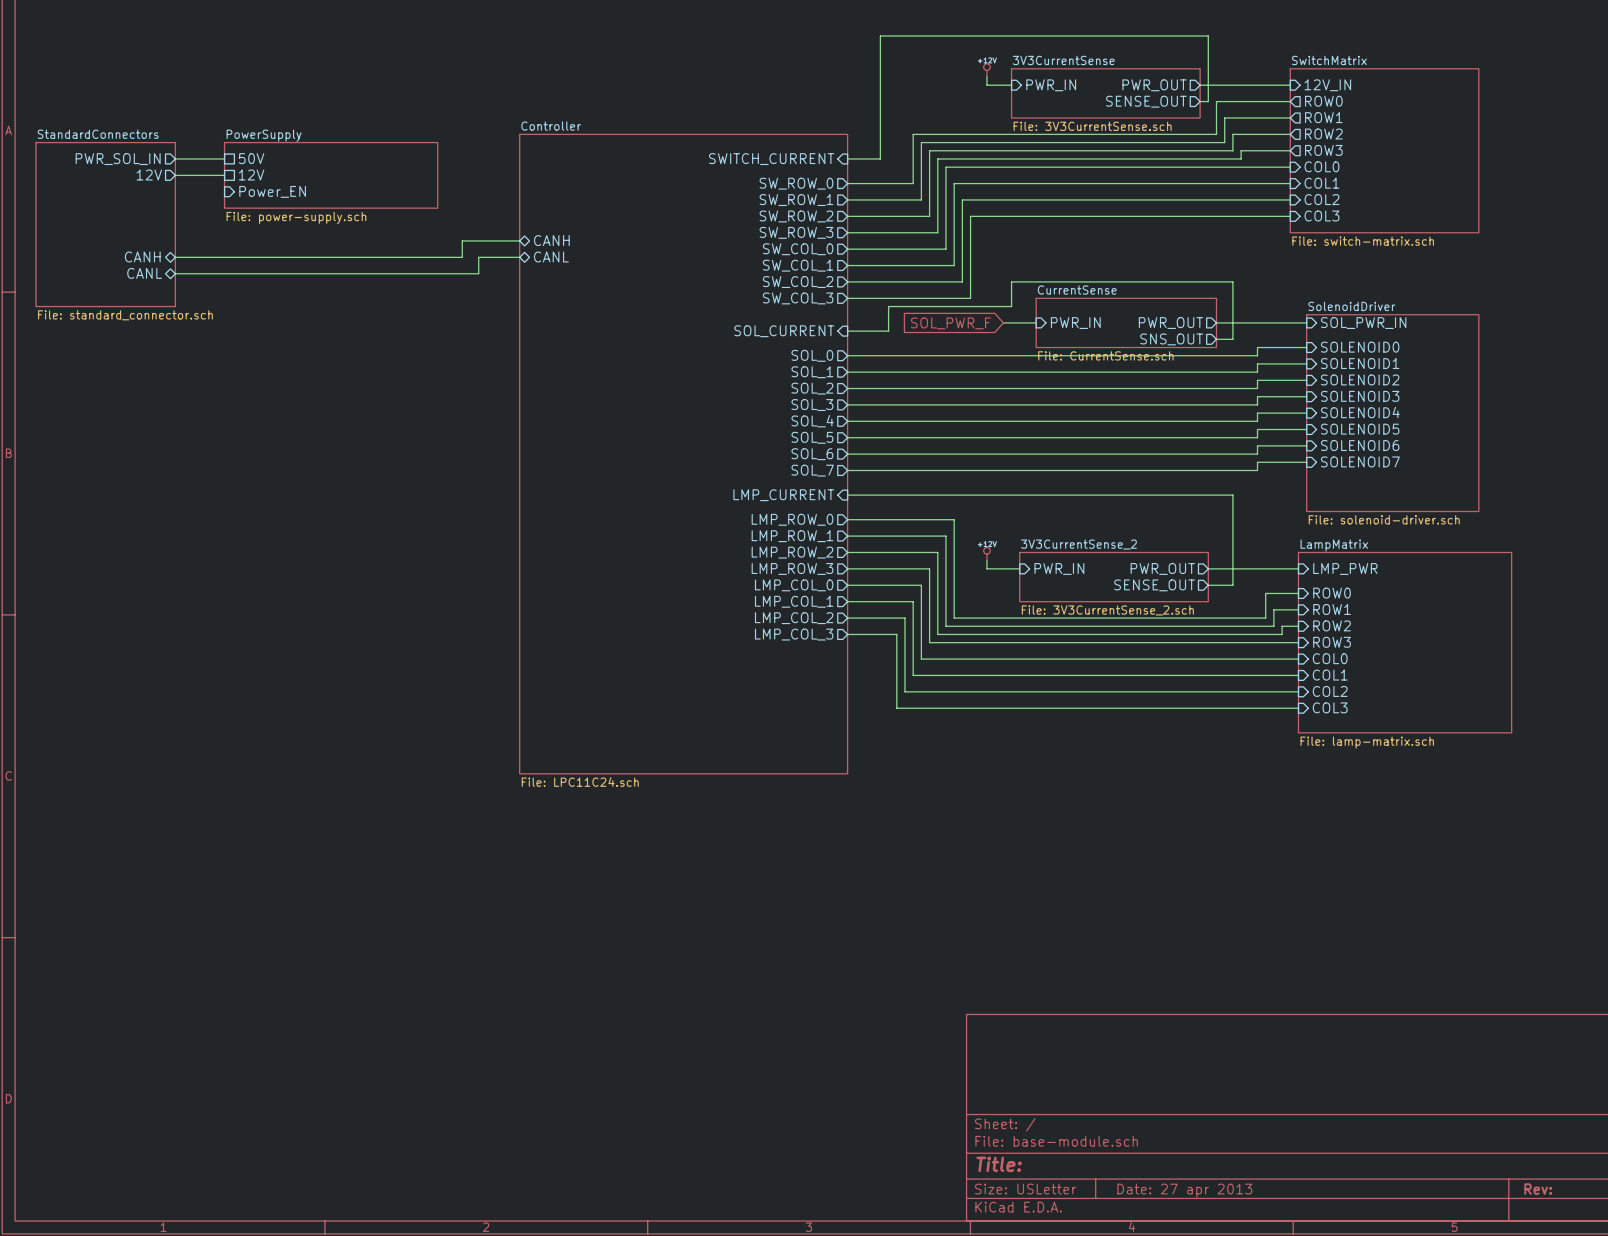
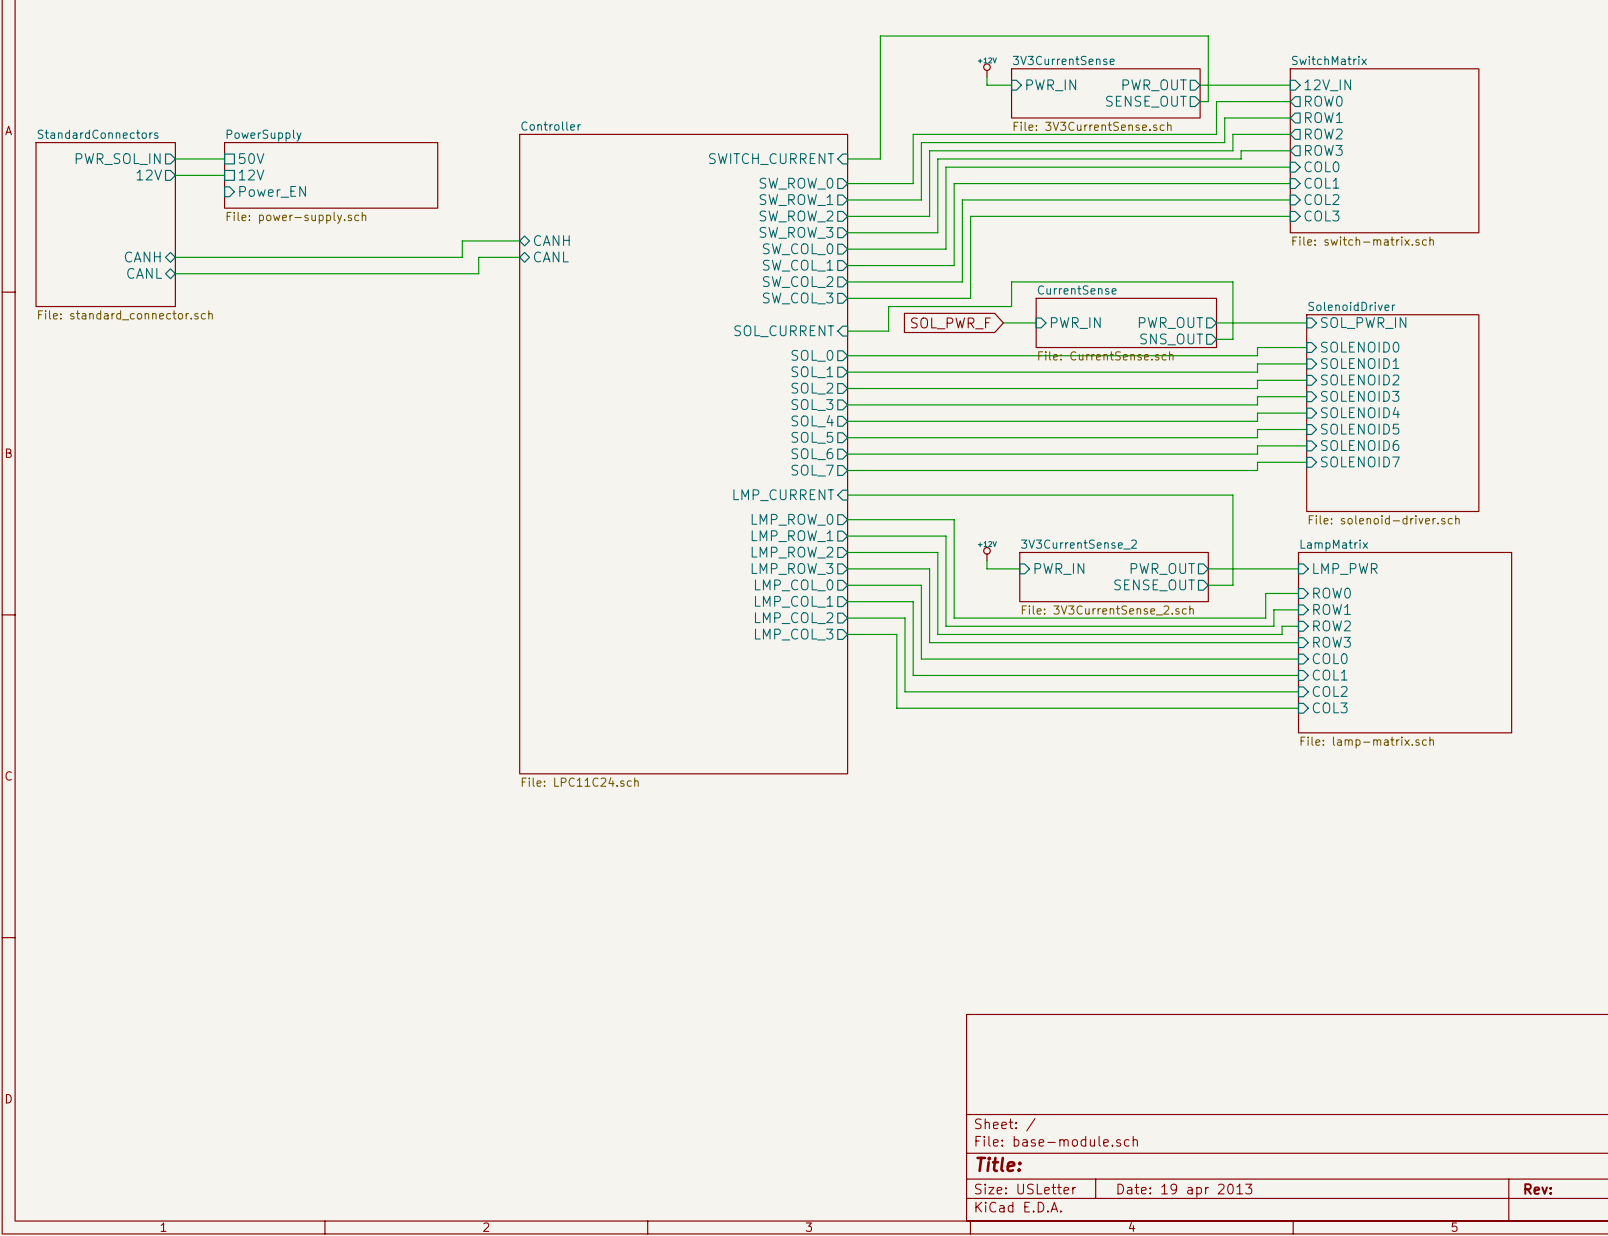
title block: Date: 27 apr 2013 (1184, 1190) -> Date: 19 apr 2013 (1184, 1190)

